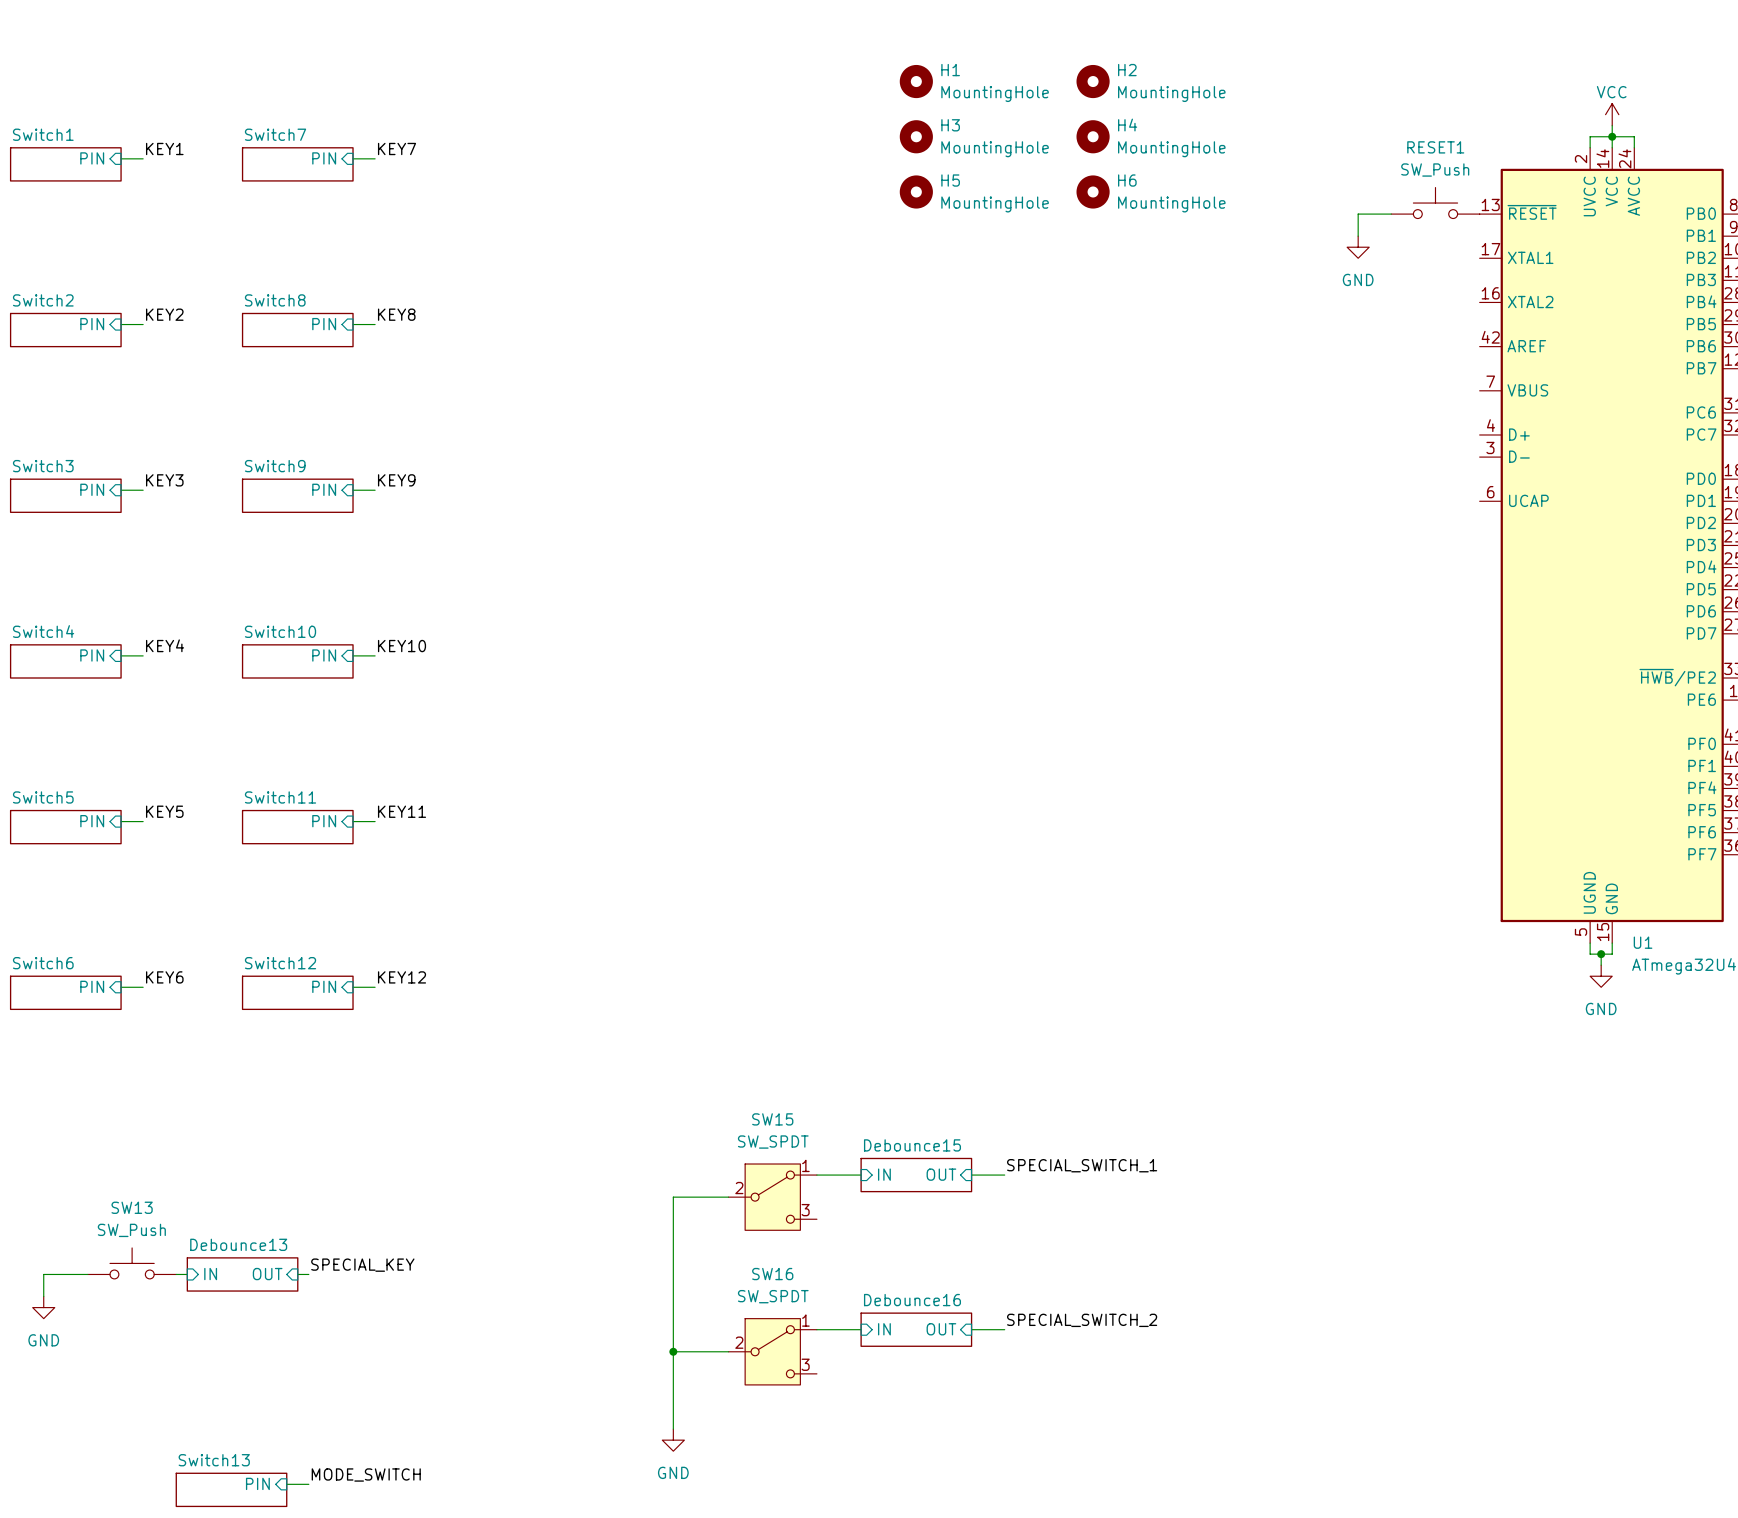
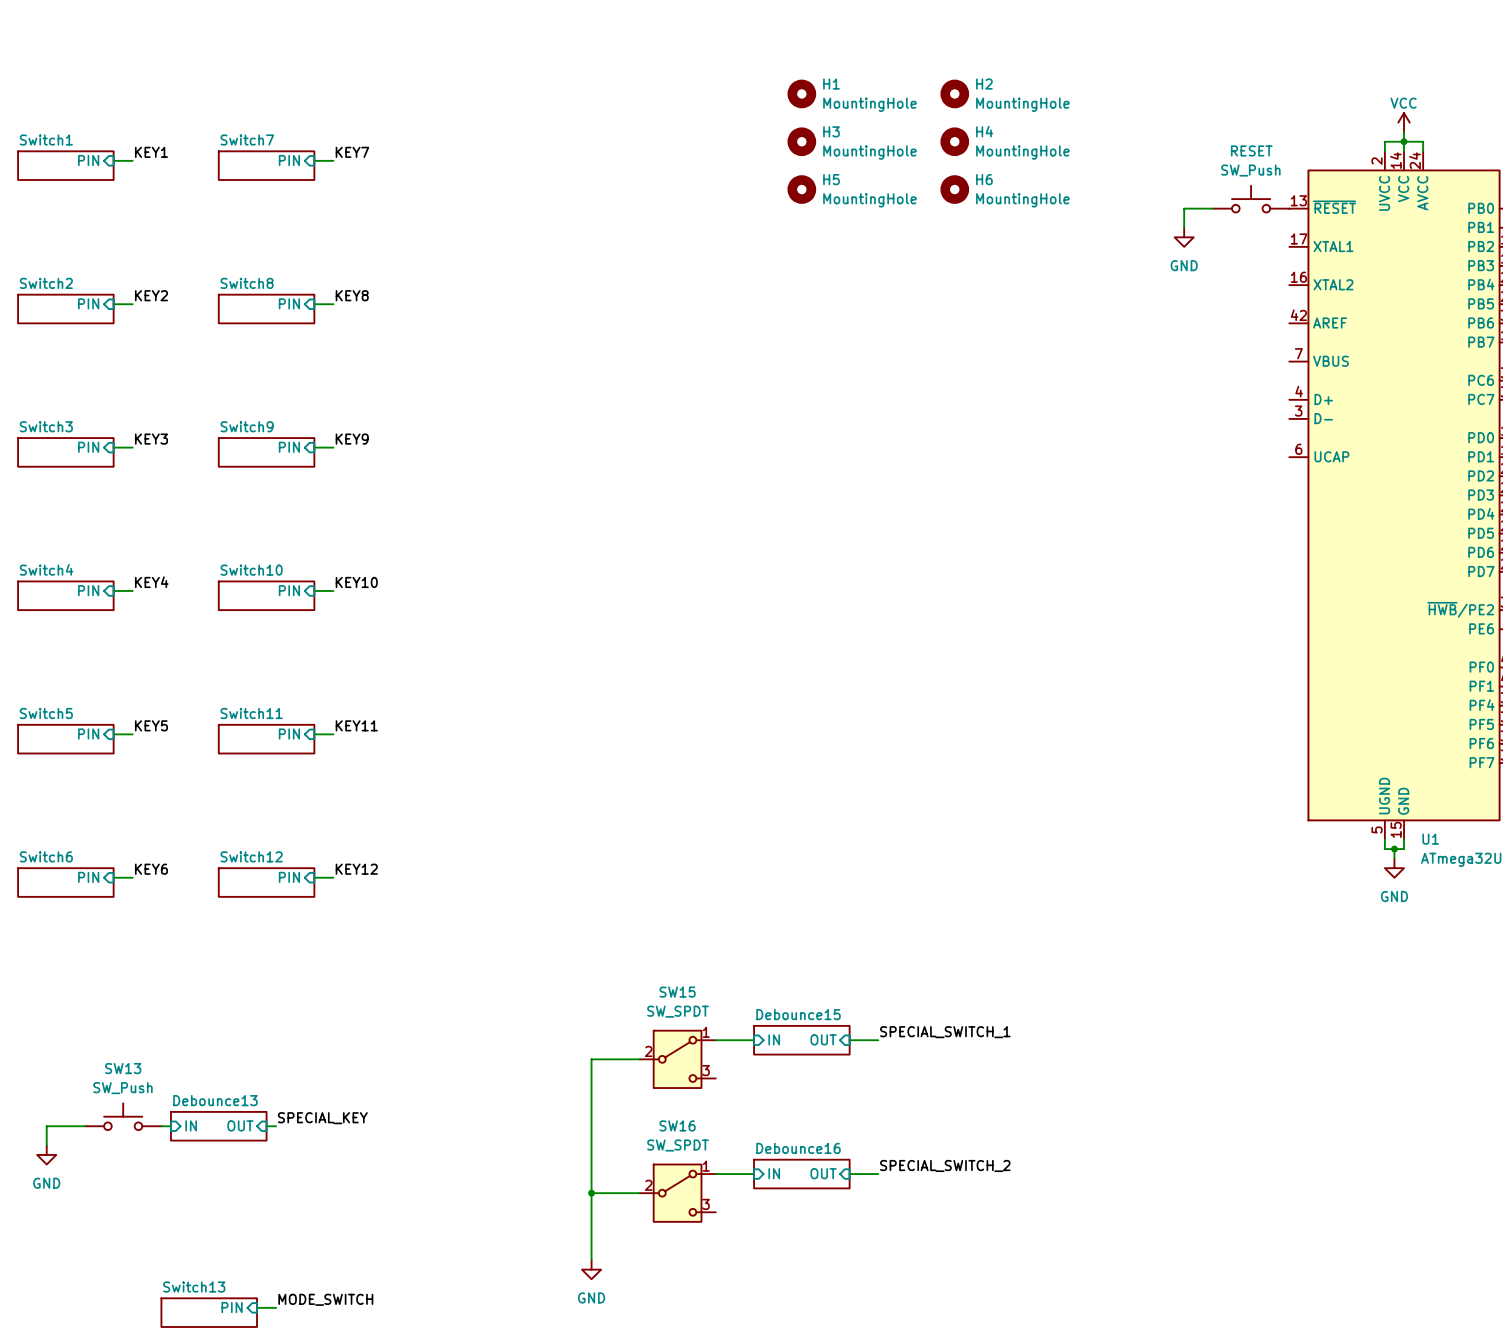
RESET1 name: RESET1 (1435, 147) -> RESET (1251, 150)

